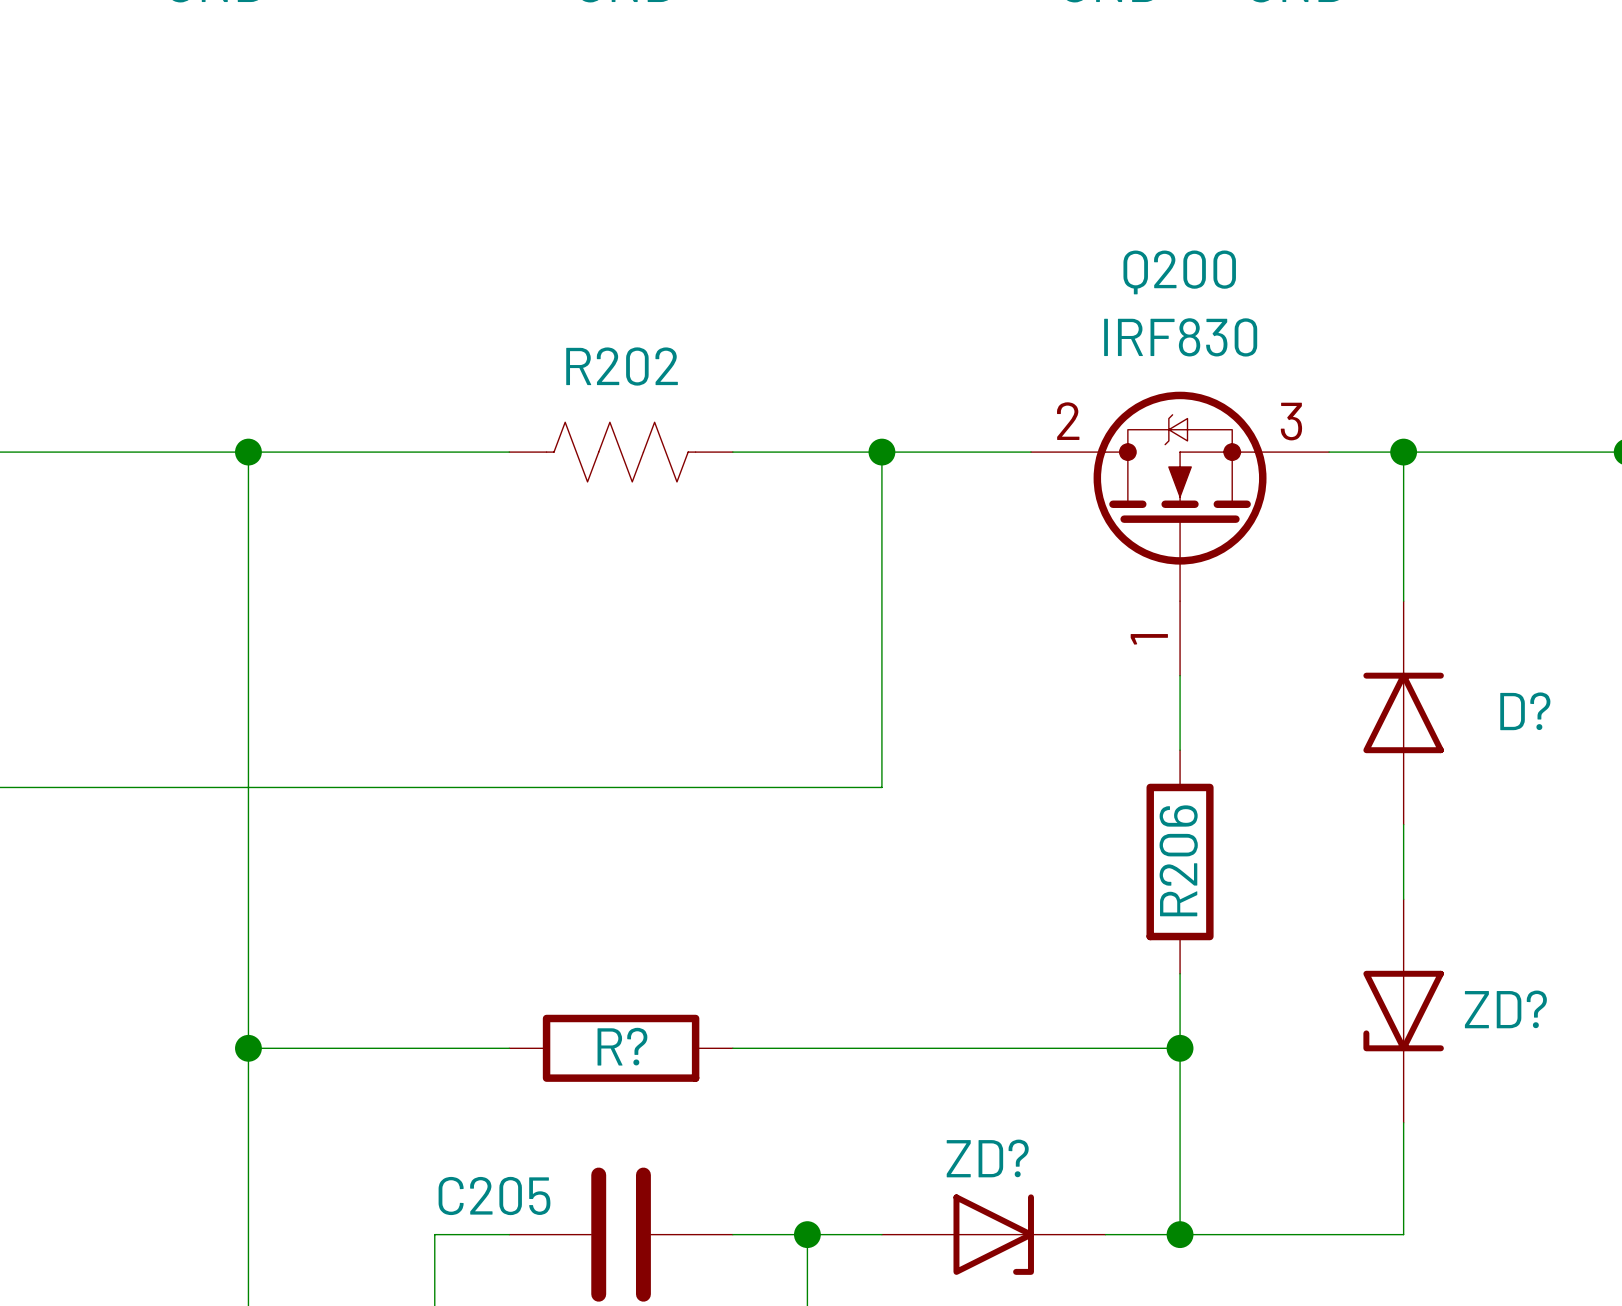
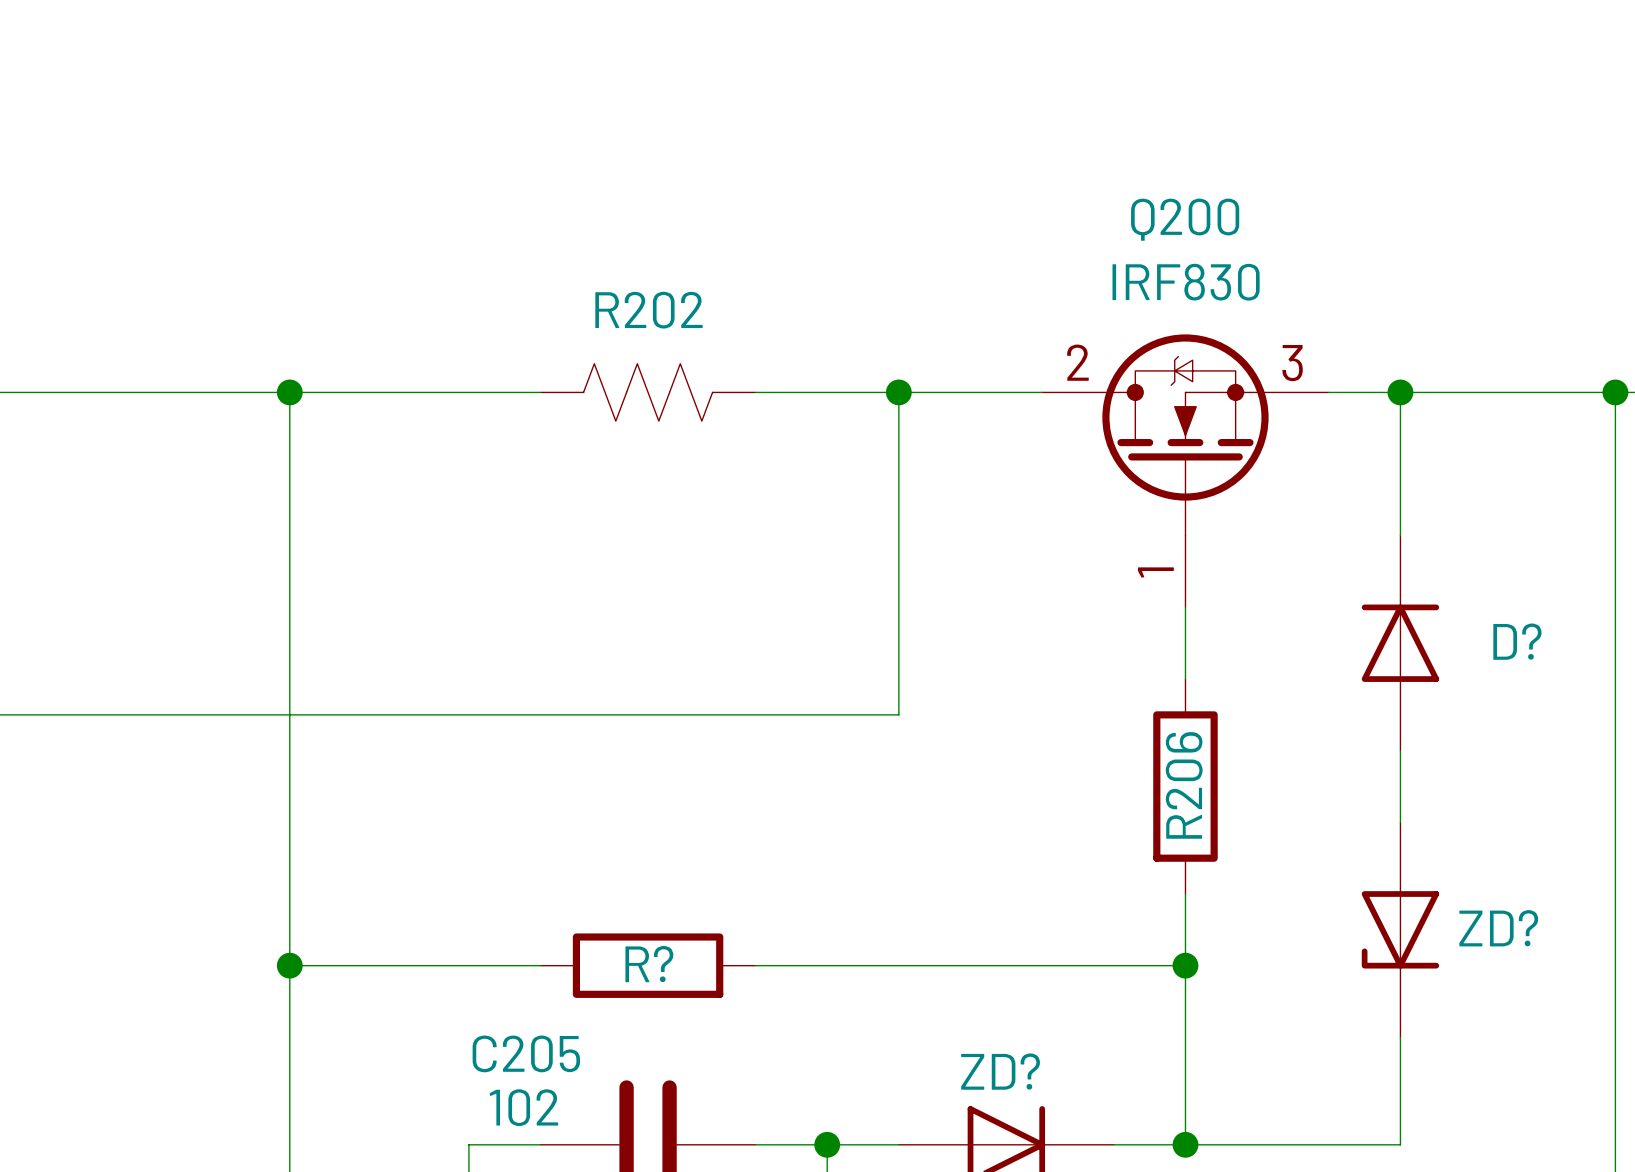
C205 value: none -> 102 (523, 1107)
C205 name position: C205 (494, 1196) -> C205 (526, 1053)

